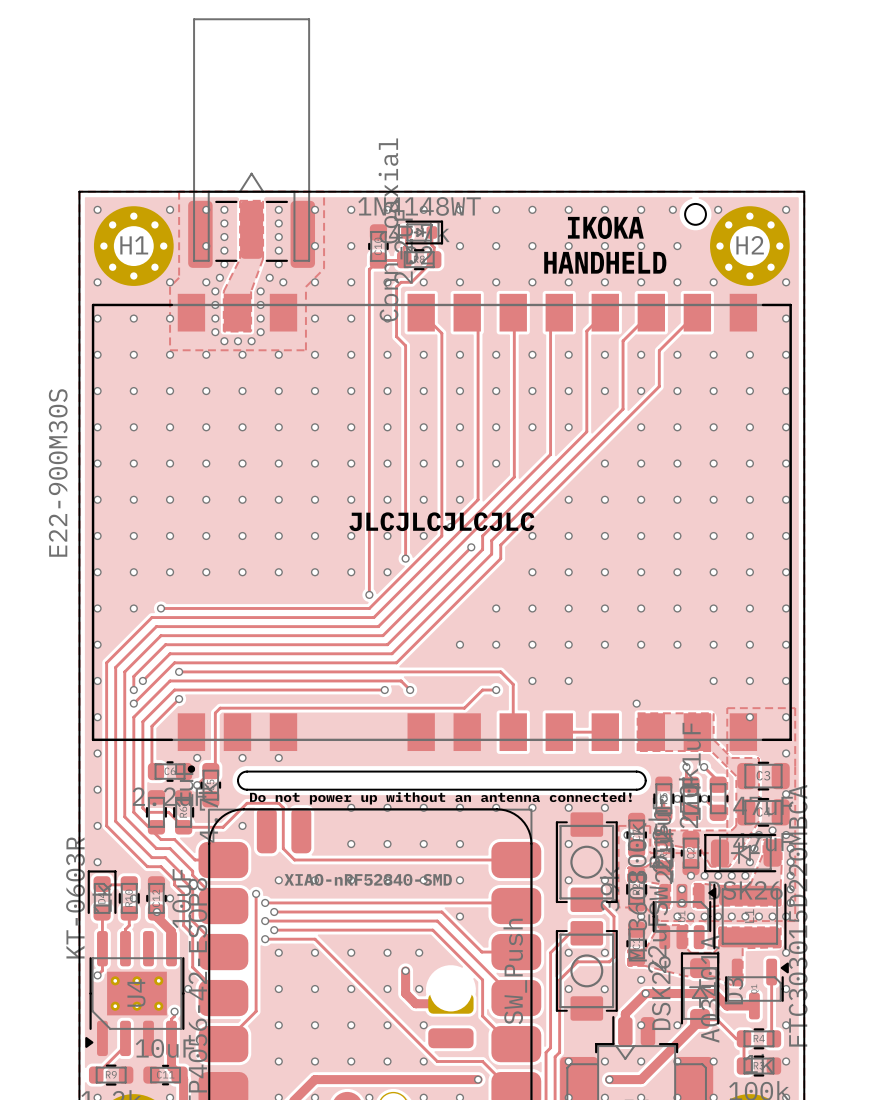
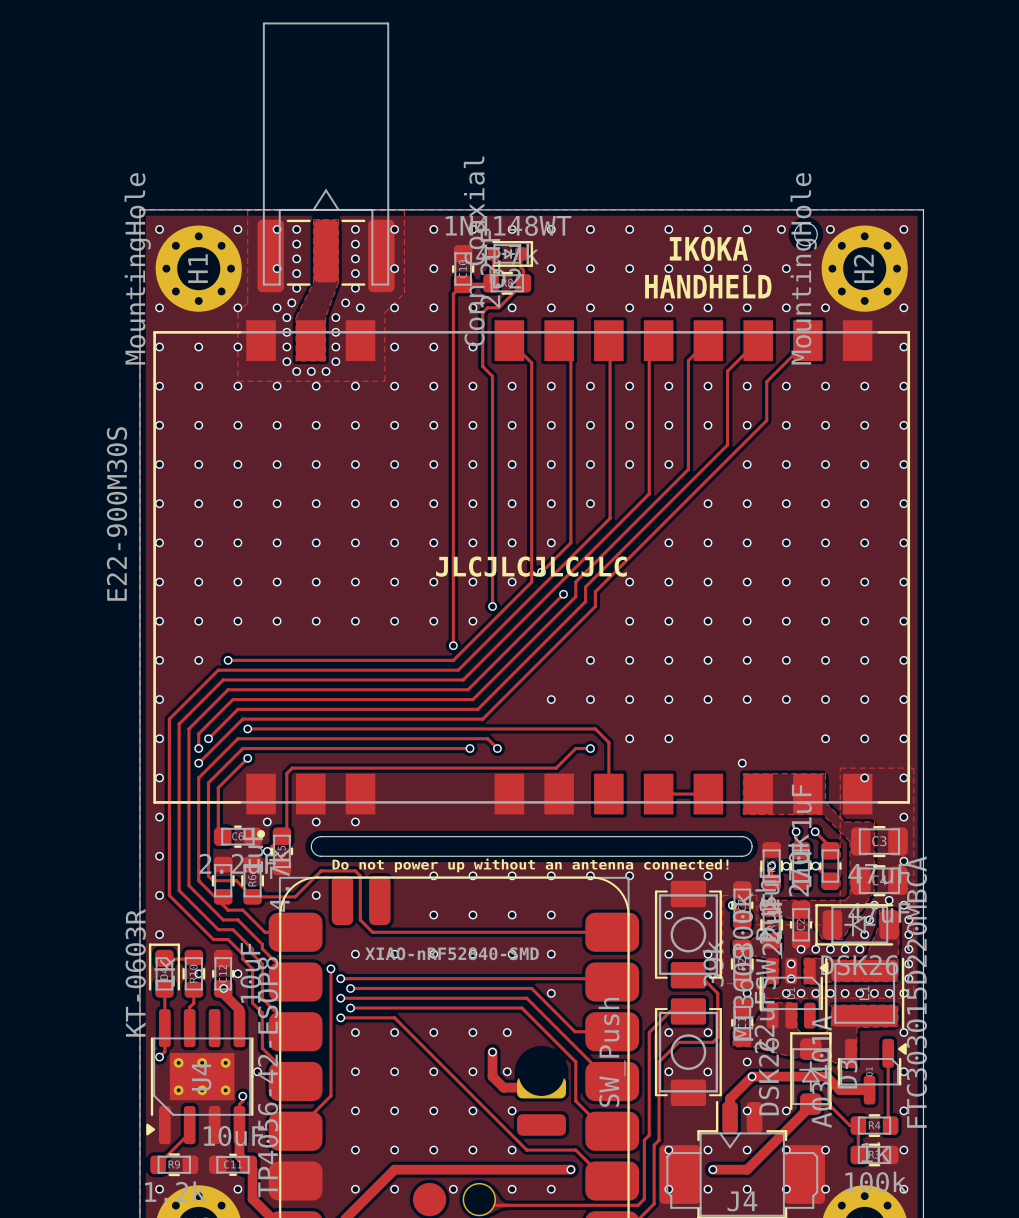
H1 name rotation: 0° (134, 245) -> 90° counterclockwise (197, 268)
H2 name rotation: 0° (750, 245) -> 90° counterclockwise (863, 268)
H1 value: none -> MountingHole (137, 268)
H2 value: none -> MountingHole (803, 268)

